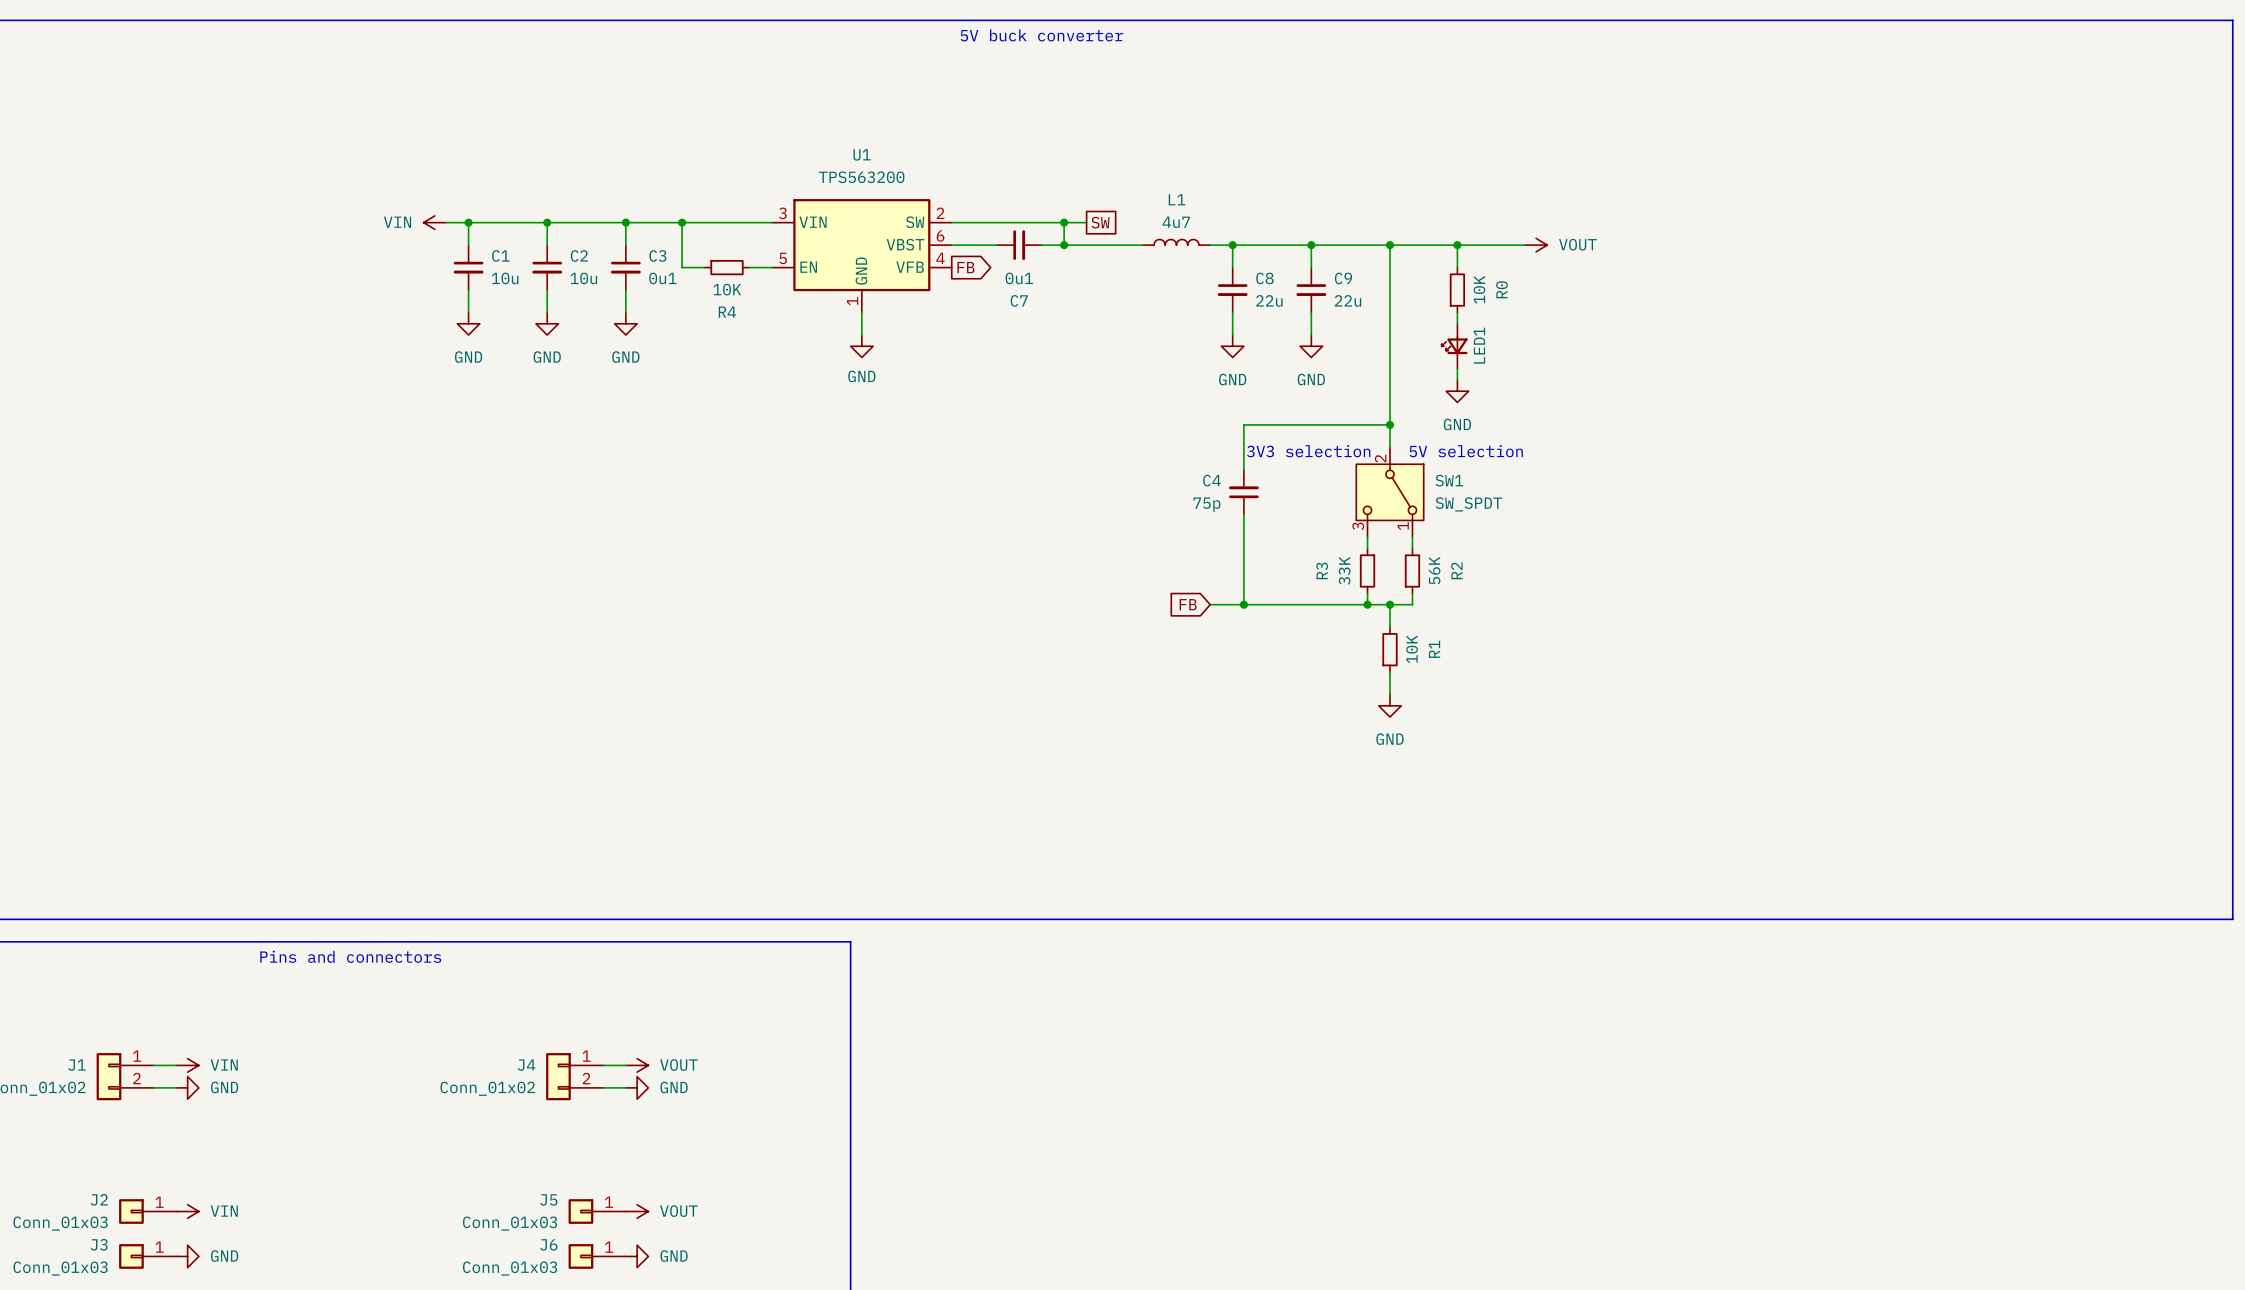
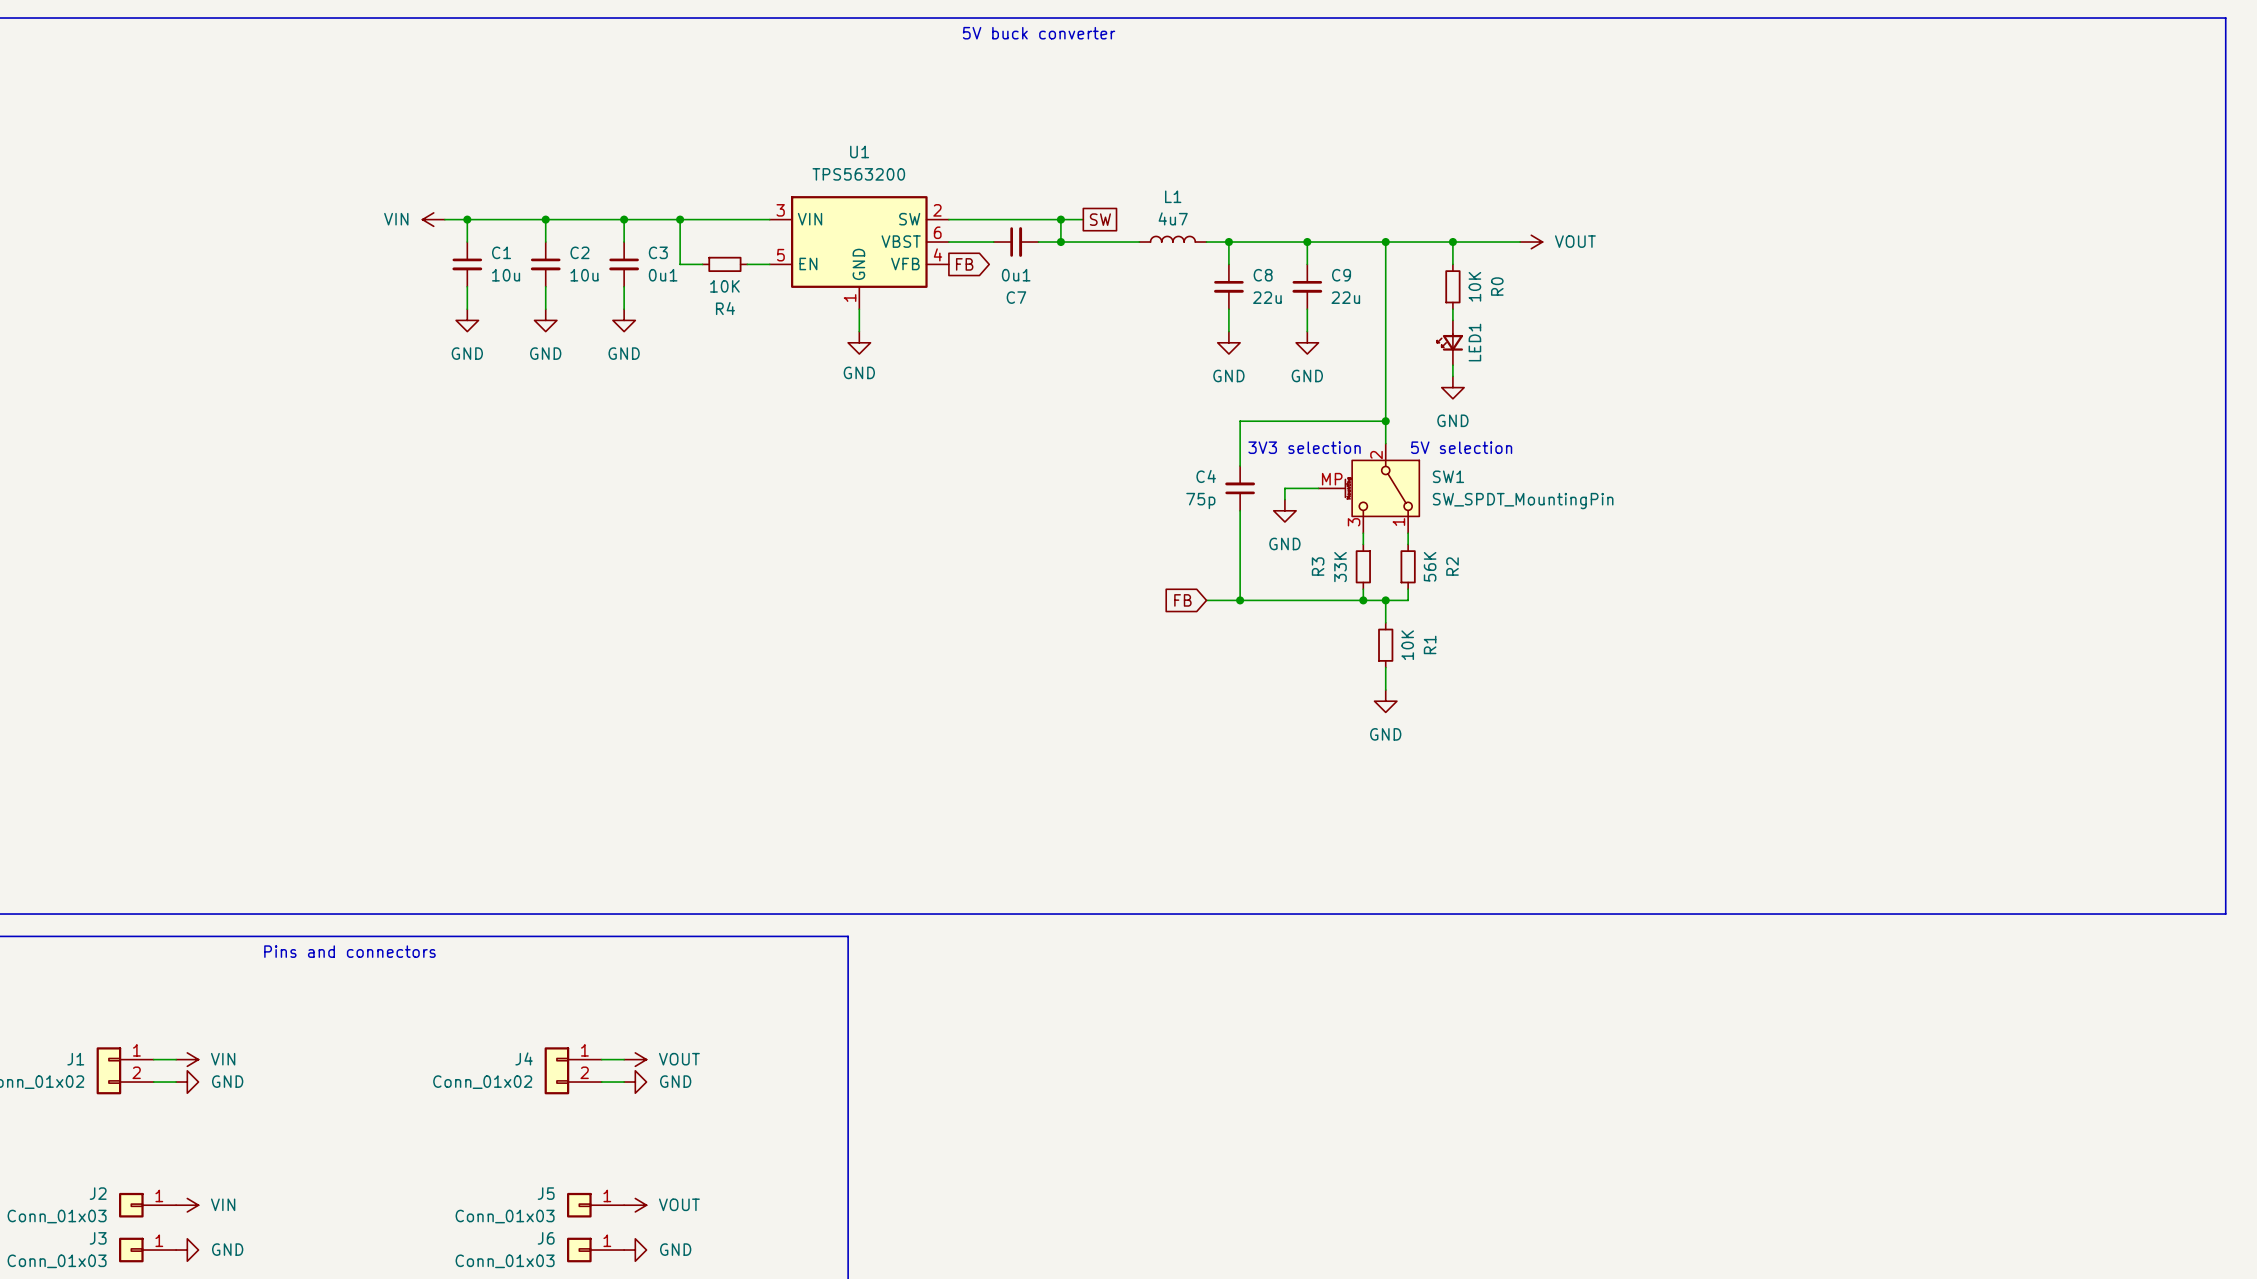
SW1 symbol: [1356, 447, 1424, 538] -> [1318, 443, 1420, 534]
wire: none -> (1318, 488) (1284, 488) (1284, 499)
SW1 value: SW_SPDT (1468, 504) -> SW_SPDT_MountingPin (1523, 501)
power symbol: none -> GND (1284, 510)

